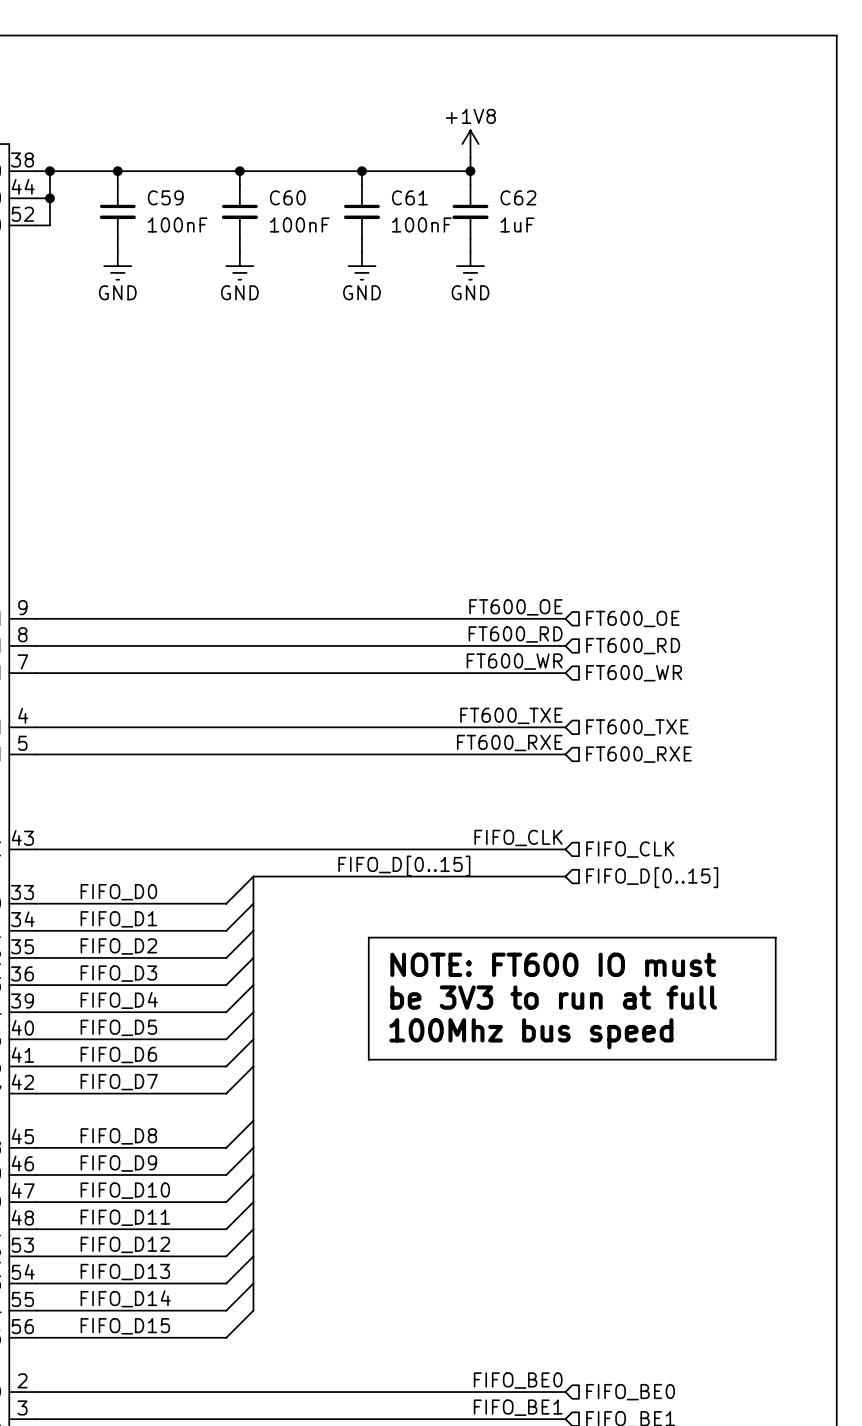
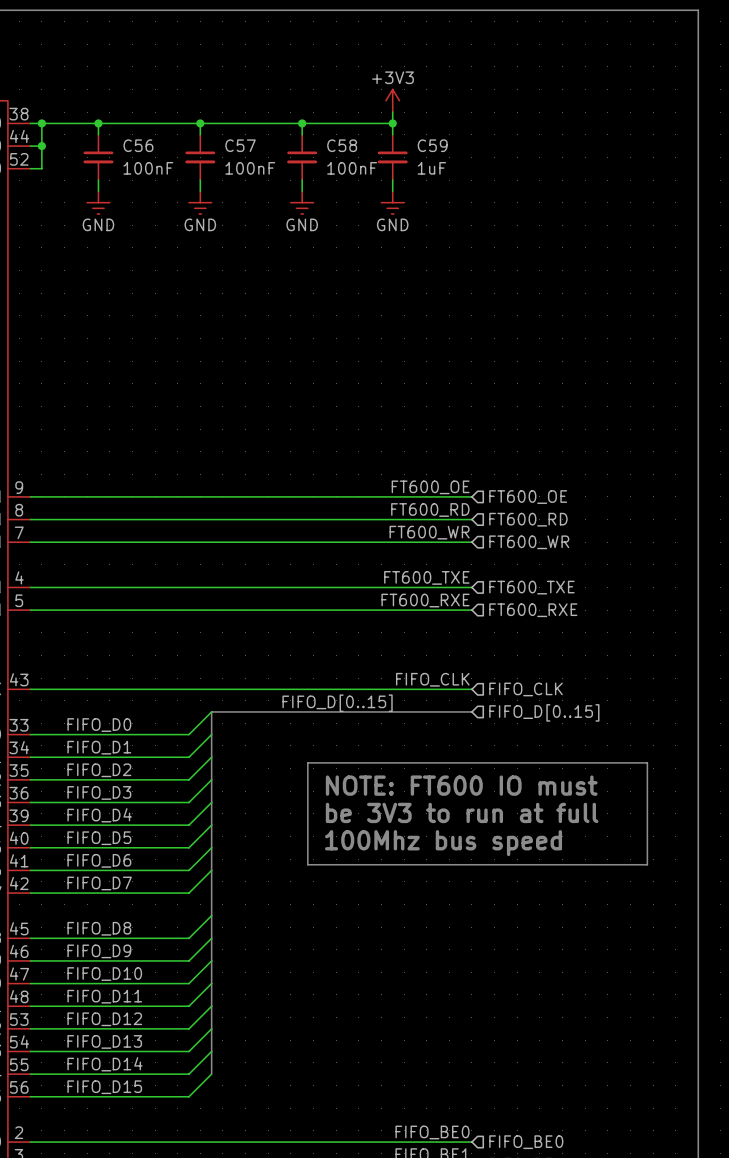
power symbol: +1V8 (470, 144) -> +3V3 (392, 100)
C59 name: C59 (165, 197) -> C56 (138, 145)
C60 name: C60 (287, 197) -> C57 (240, 145)
C61 name: C61 (409, 197) -> C58 (342, 145)
C62 name: C62 (518, 197) -> C59 (432, 145)

